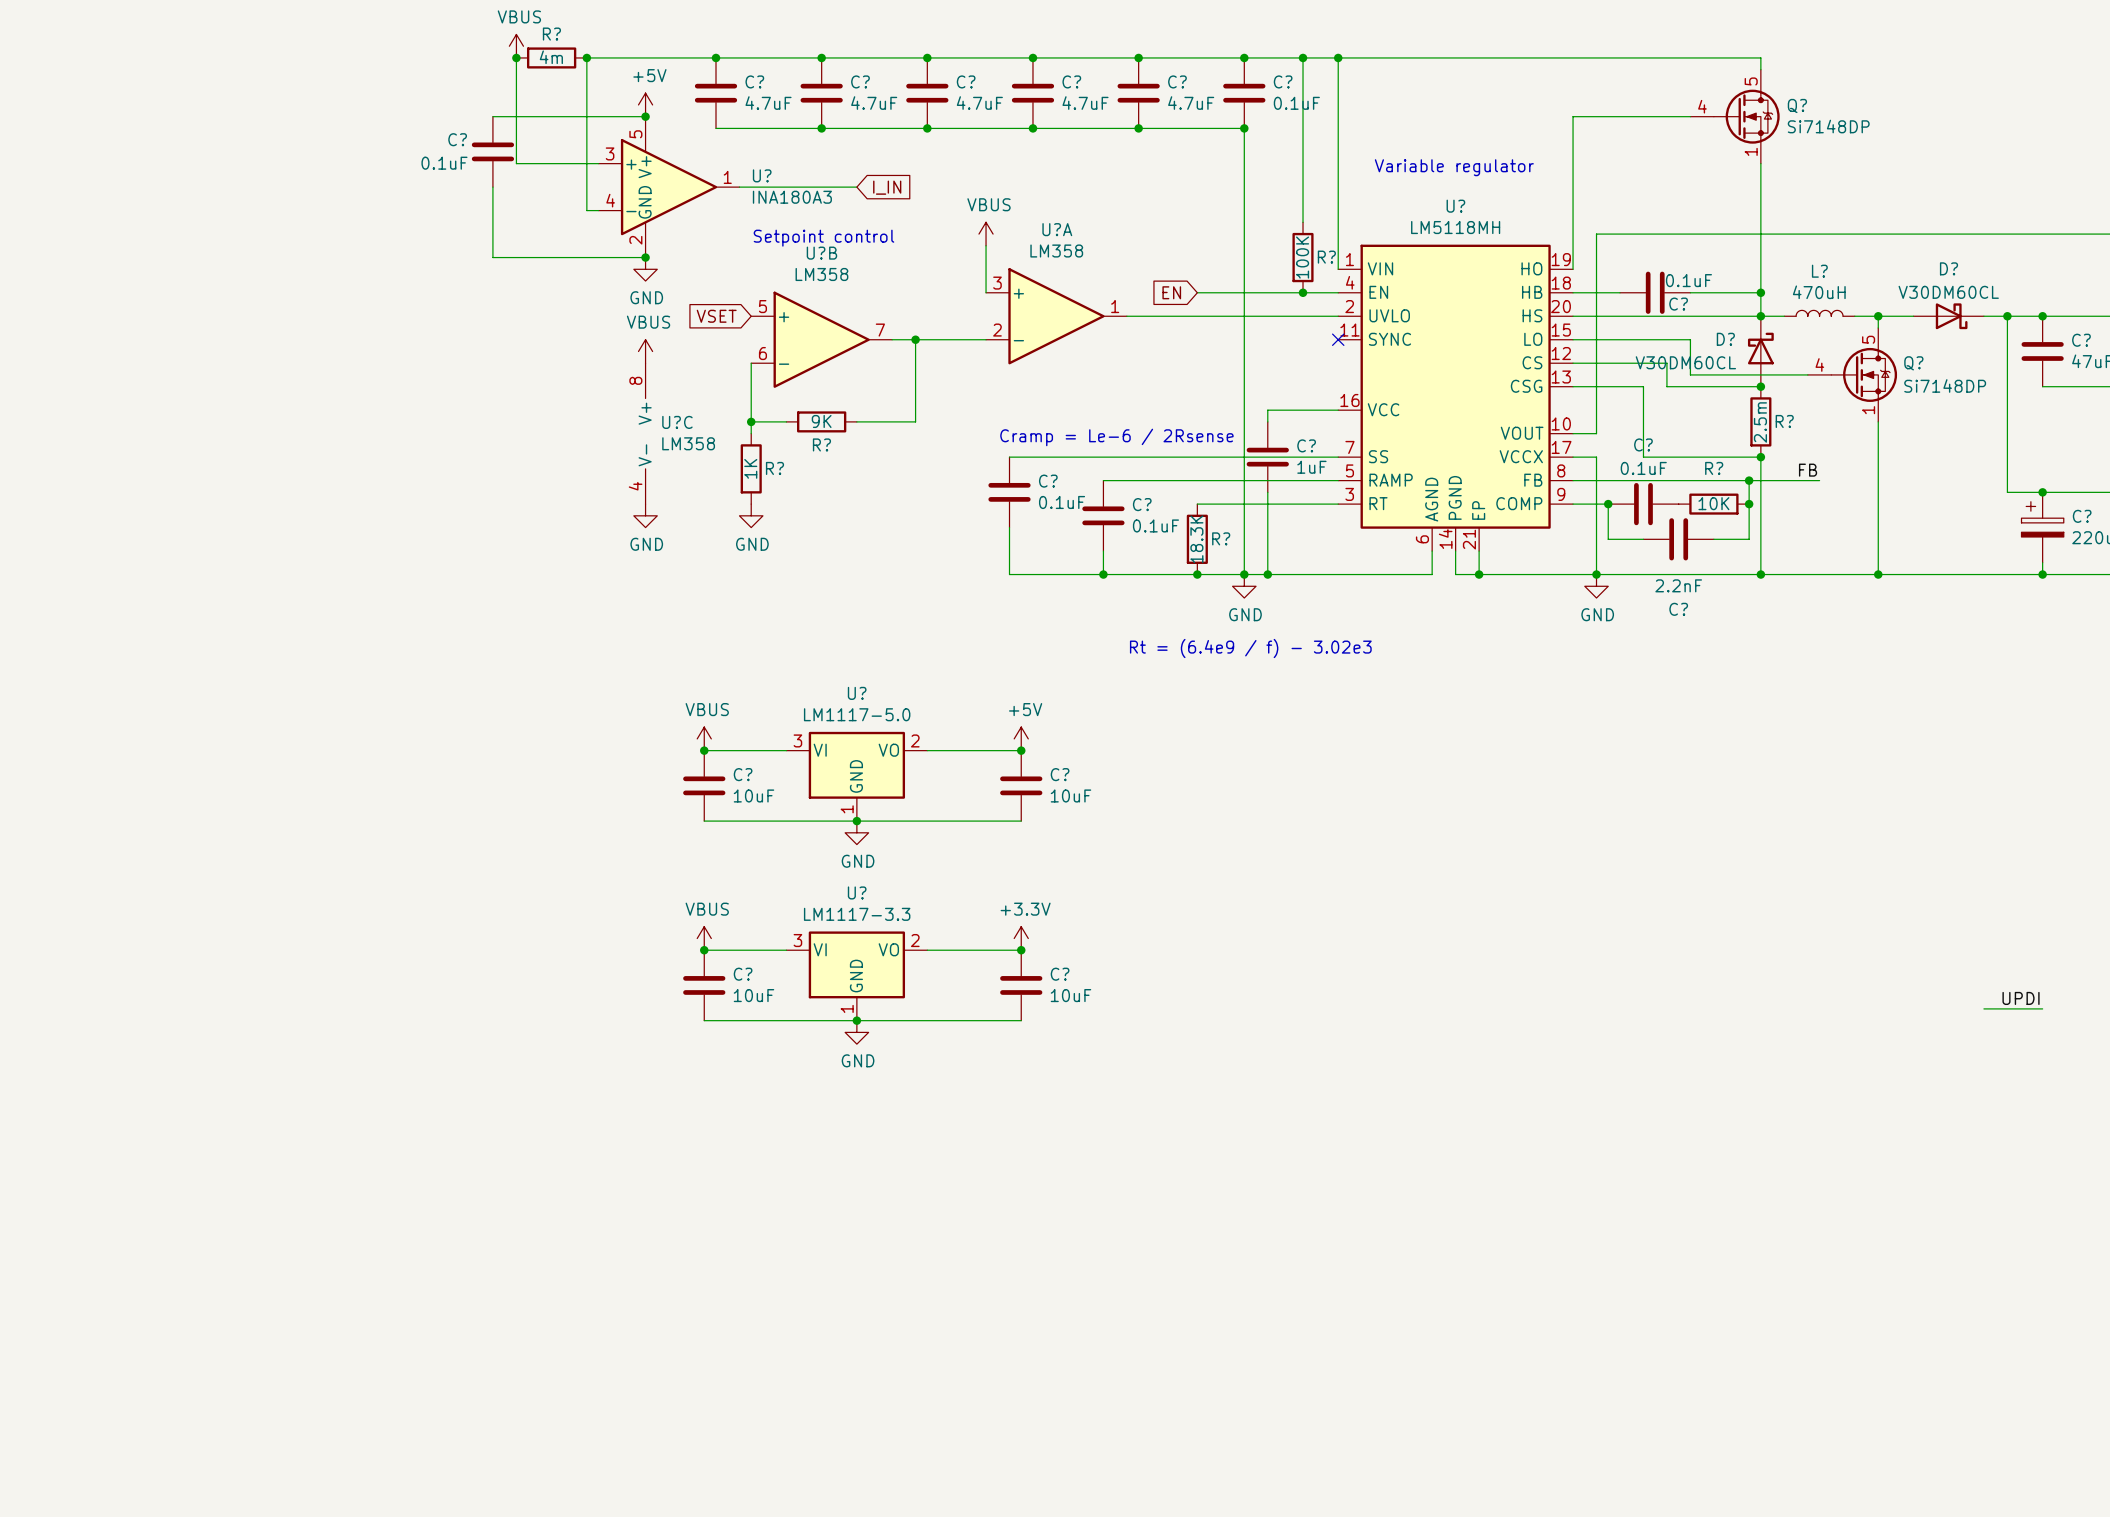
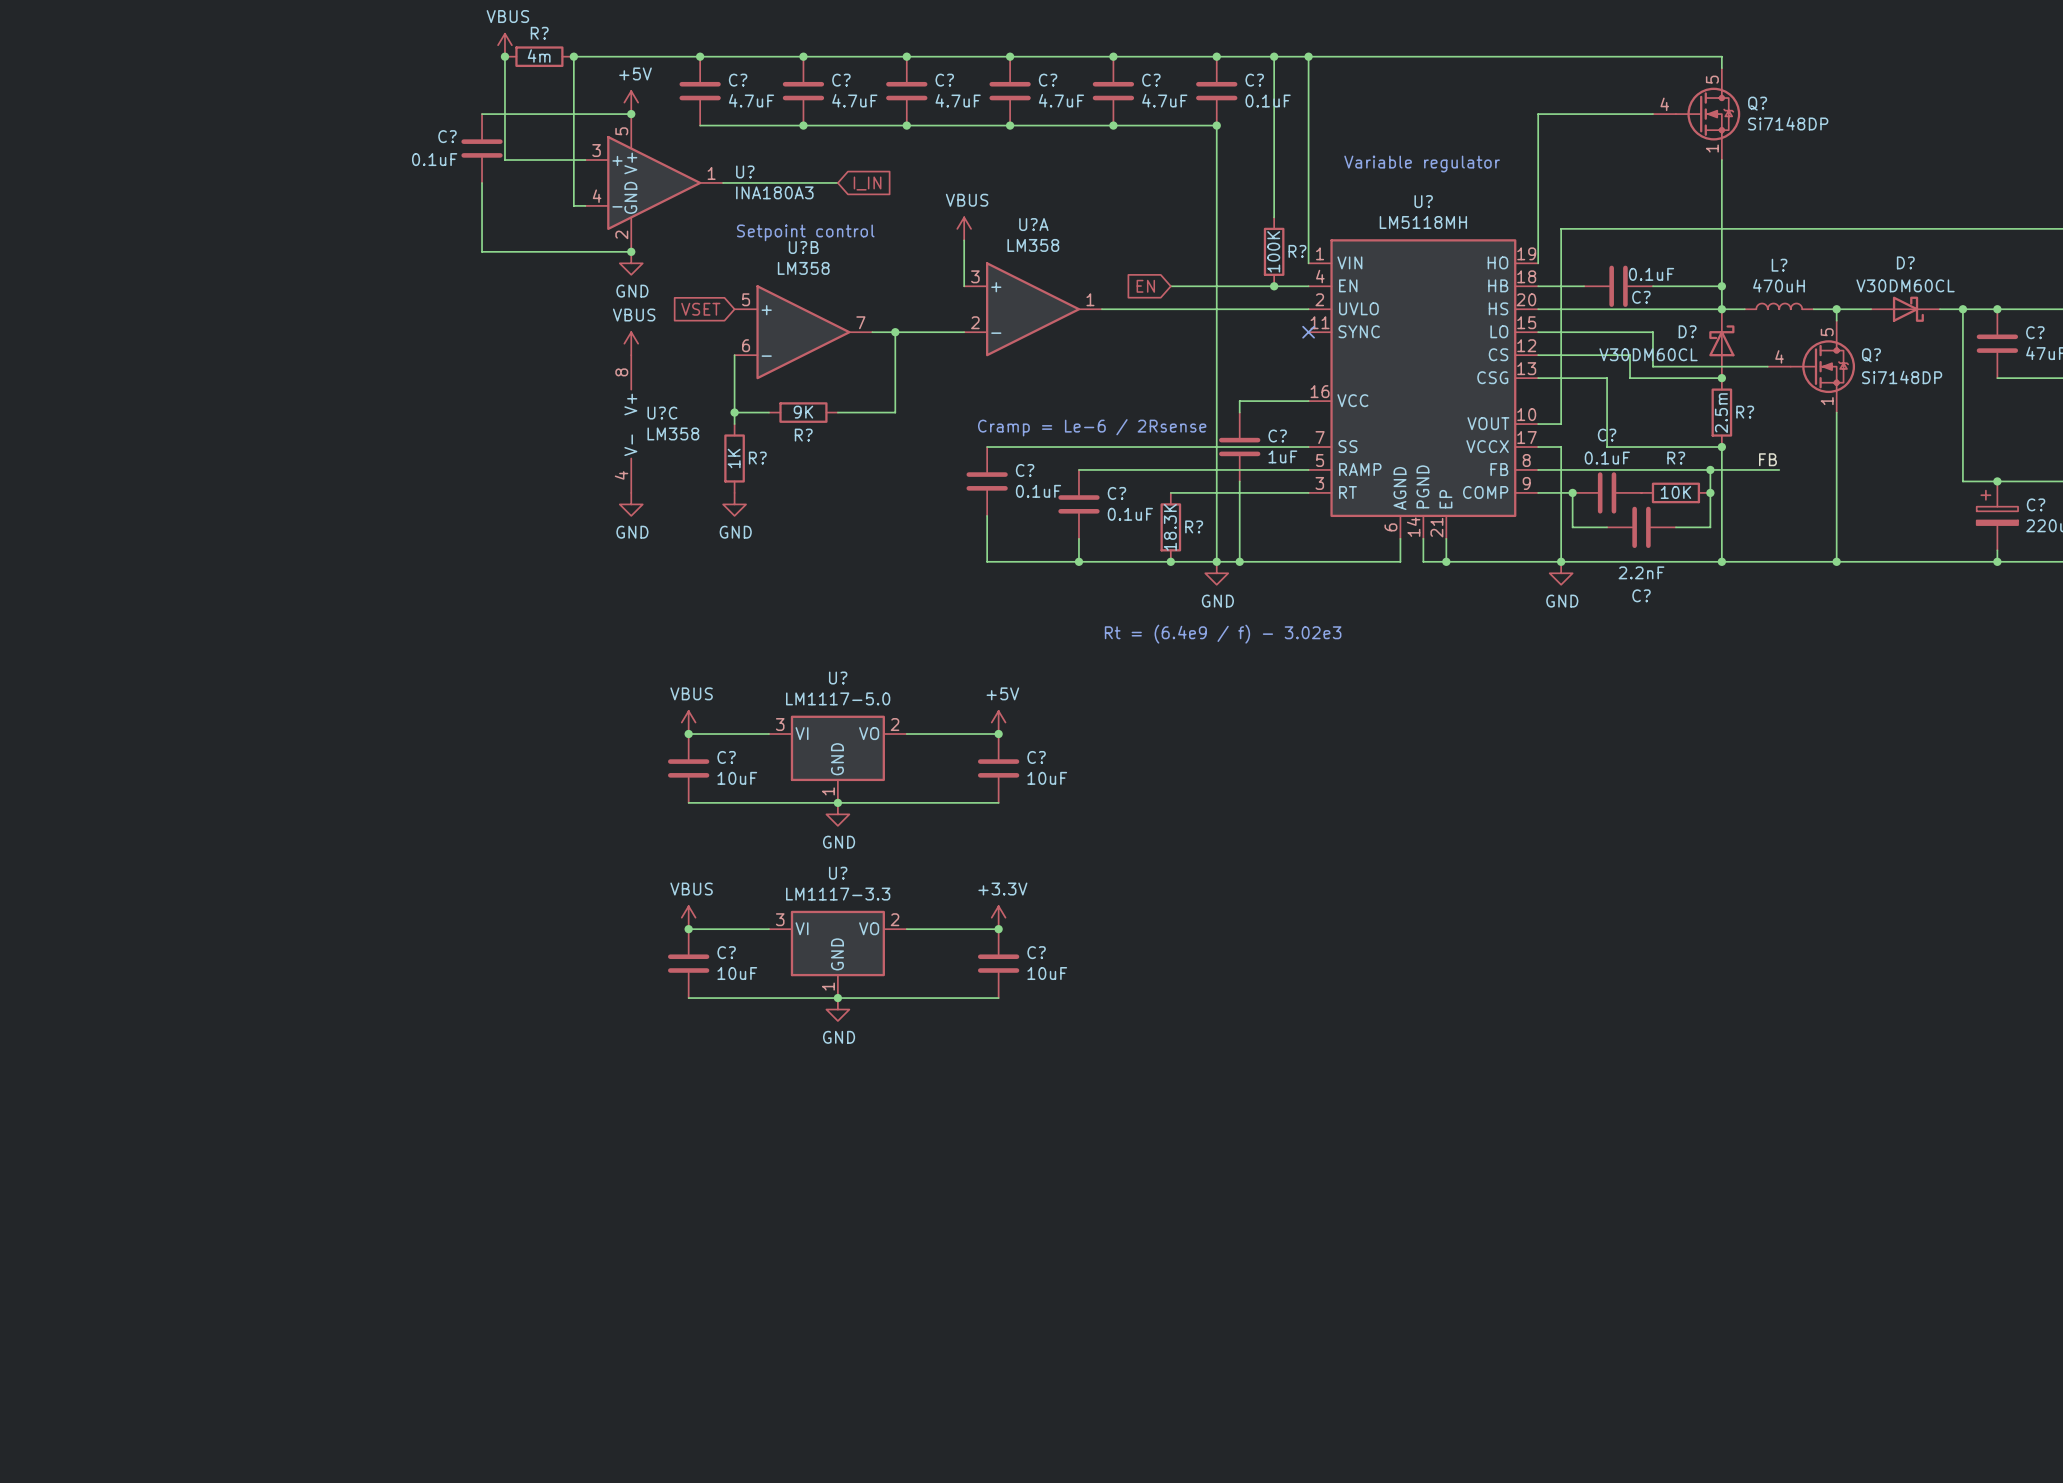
label: UPDI (2021, 998) -> none
wire: (1983, 1008) (2042, 1008) -> none

